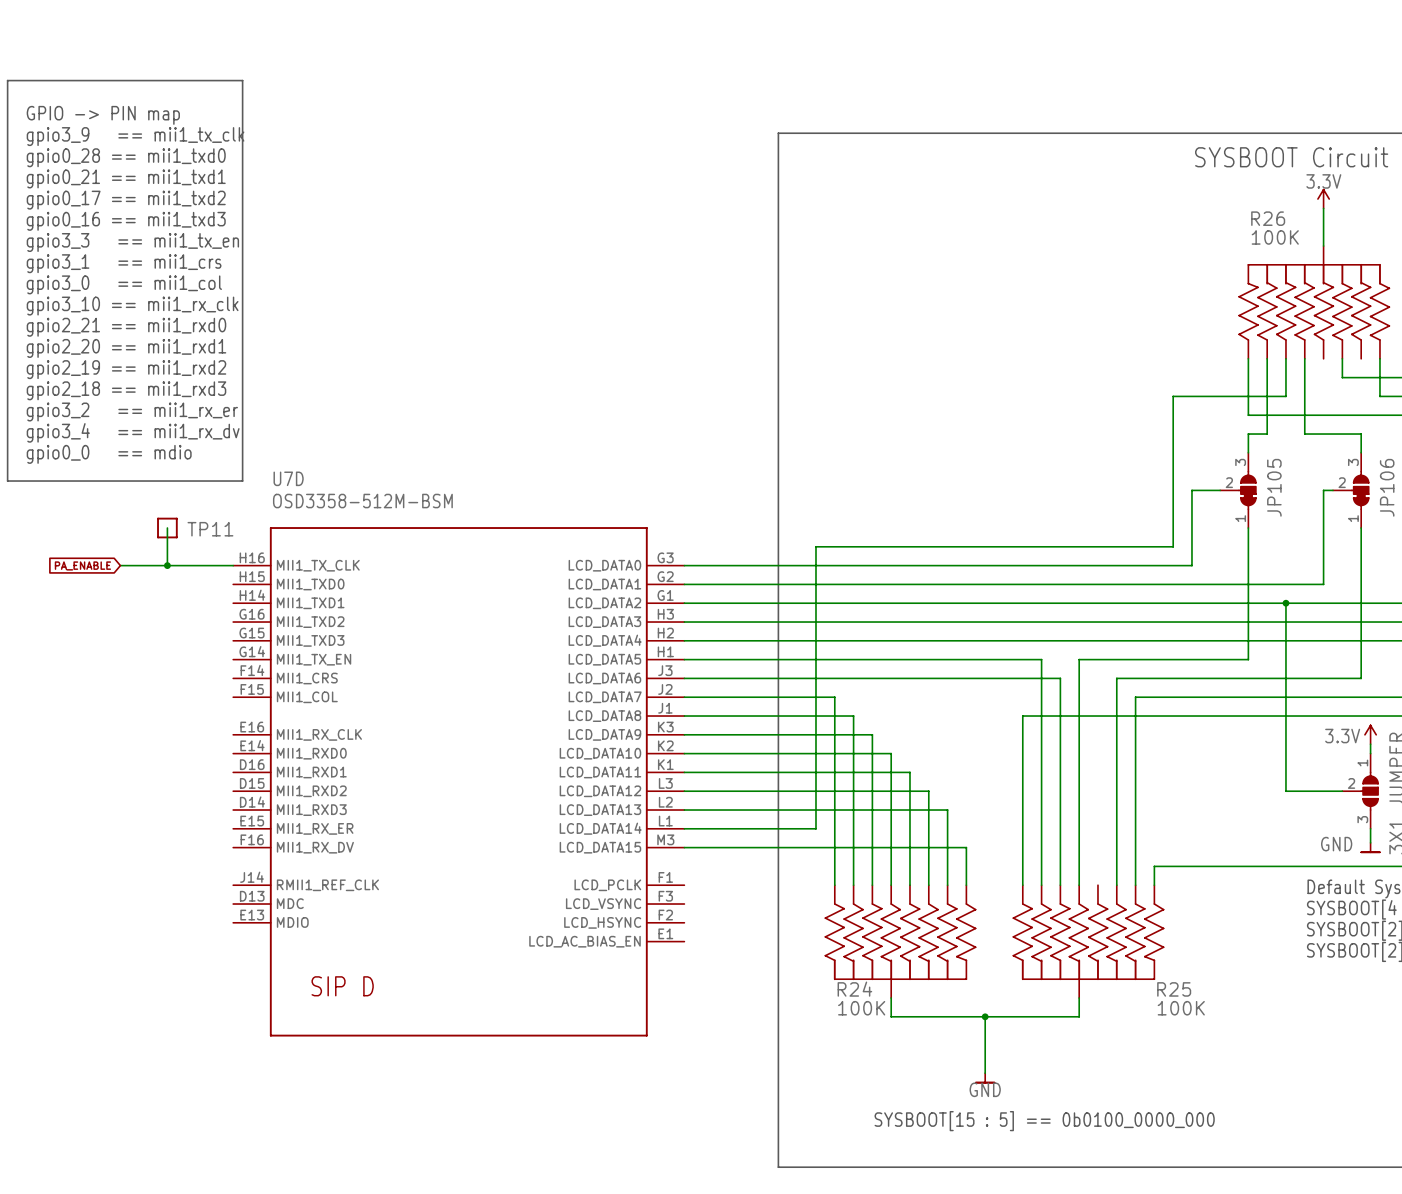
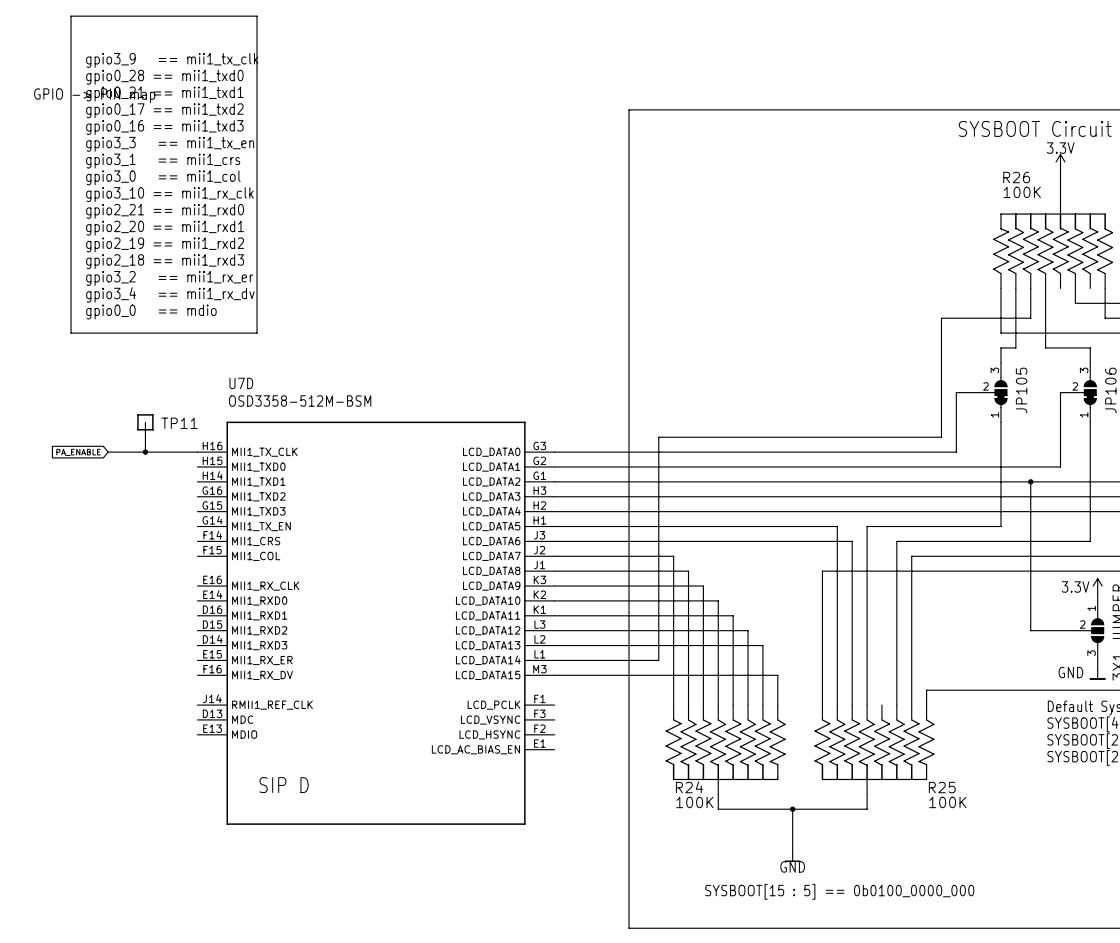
line: (7, 80) (7, 481) (242, 481) (242, 80) (7, 80) -> (71, 16) (71, 333) (257, 333) (257, 16) (71, 16)
text position: gpio3_9 == mii1_tx_clk (135, 136) -> gpio3_9 == mii1_tx_clk (172, 60)
text position: gpio0_28 == mii1_txd0 (126, 157) -> gpio0_28 == mii1_txd0 (164, 77)
text position: gpio0_21 == mii1_txd1 (126, 178) -> gpio0_21 == mii1_txd1 (164, 93)
text position: gpio0_17 == mii1_txd2 (126, 200) -> gpio0_17 == mii1_txd2 (164, 110)
text position: gpio0_16 == mii1_txd3 (126, 221) -> gpio0_16 == mii1_txd3 (164, 127)
text position: gpio3_3 == mii1_tx_en (132, 242) -> gpio3_3 == mii1_tx_en (170, 144)
text position: gpio3_1 == mii1_crs (124, 263) -> gpio3_1 == mii1_crs (163, 161)
text position: gpio3_0 == mii1_col (124, 284) -> gpio3_0 == mii1_col (163, 177)
text position: gpio3_10 == mii1_rx_clk (132, 306) -> gpio3_10 == mii1_rx_clk (169, 194)
text position: gpio2_21 == mii1_rxd0 (126, 327) -> gpio2_21 == mii1_rxd0 (165, 211)
text position: gpio2_20 == mii1_rxd1 (126, 348) -> gpio2_20 == mii1_rxd1 (165, 228)
text position: gpio2_19 == mii1_rxd2 (126, 369) -> gpio2_19 == mii1_rxd2 (165, 244)
text position: gpio2_18 == mii1_rxd3 (126, 390) -> gpio2_18 == mii1_rxd3 (165, 261)
text position: gpio3_2 == mii1_rx_er (132, 411) -> gpio3_2 == mii1_rx_er (169, 278)
text position: gpio3_4 == mii1_rx_dv (133, 432) -> gpio3_4 == mii1_rx_dv (170, 294)
text position: gpio0_0 == mdio (109, 454) -> gpio0_0 == mdio (151, 311)

